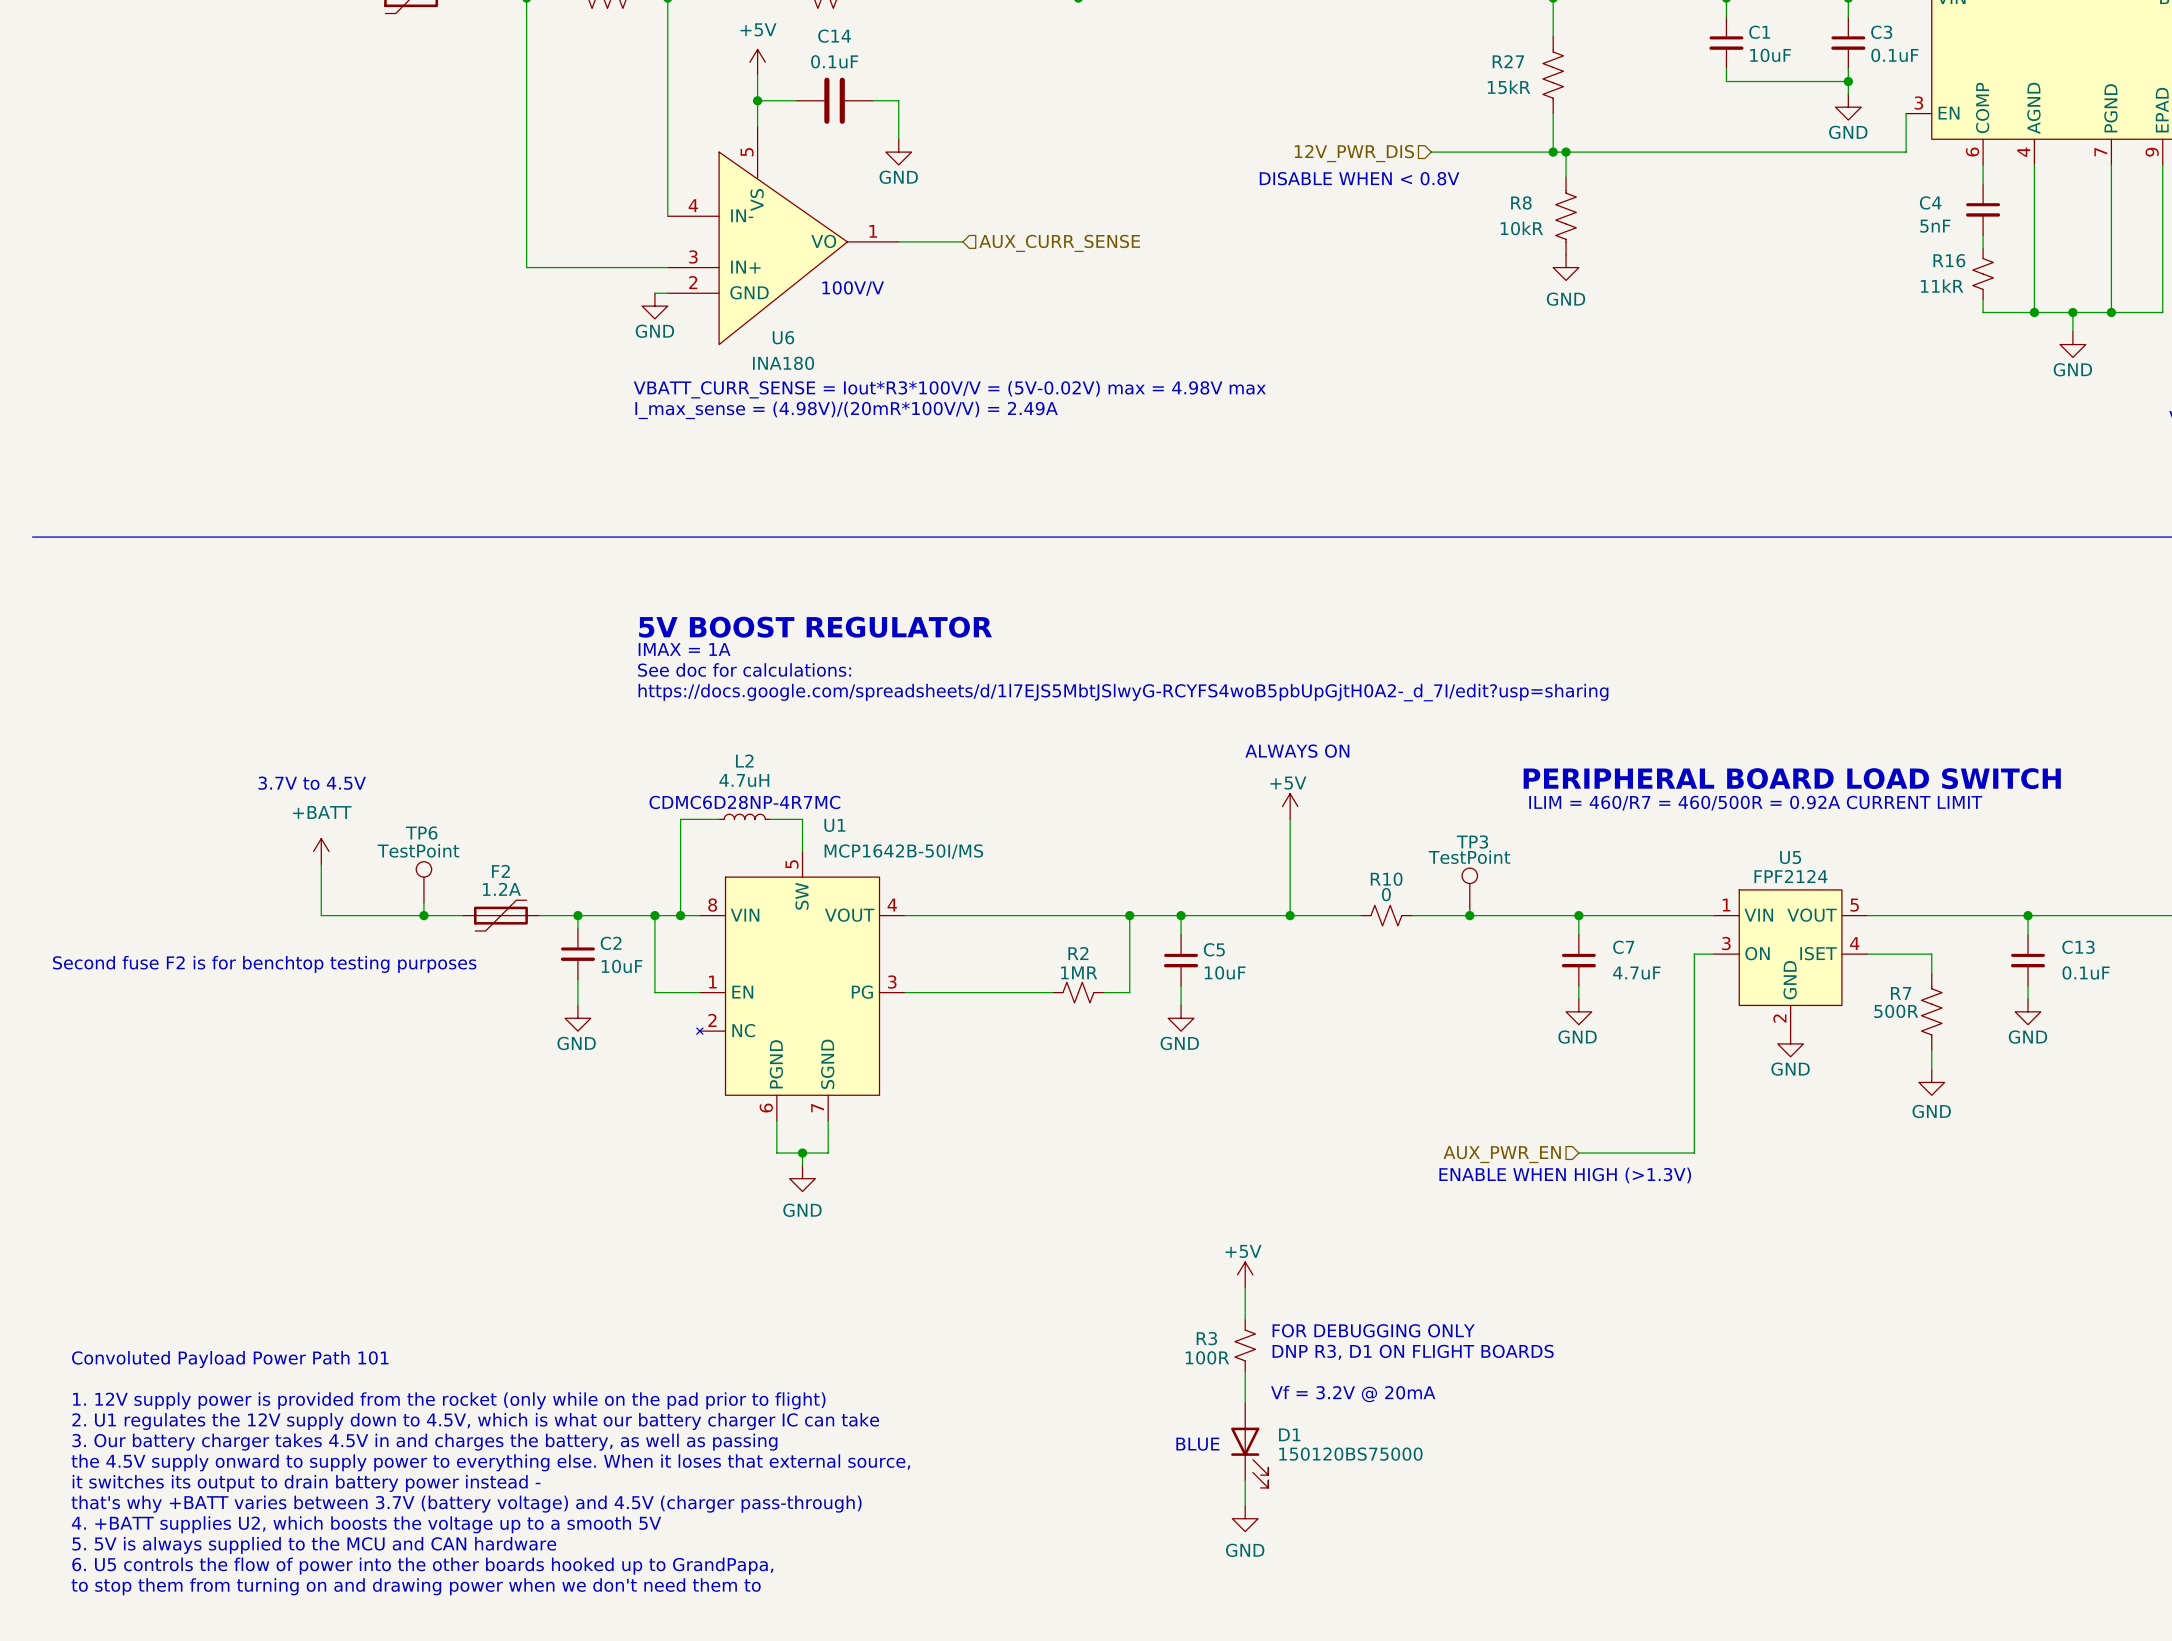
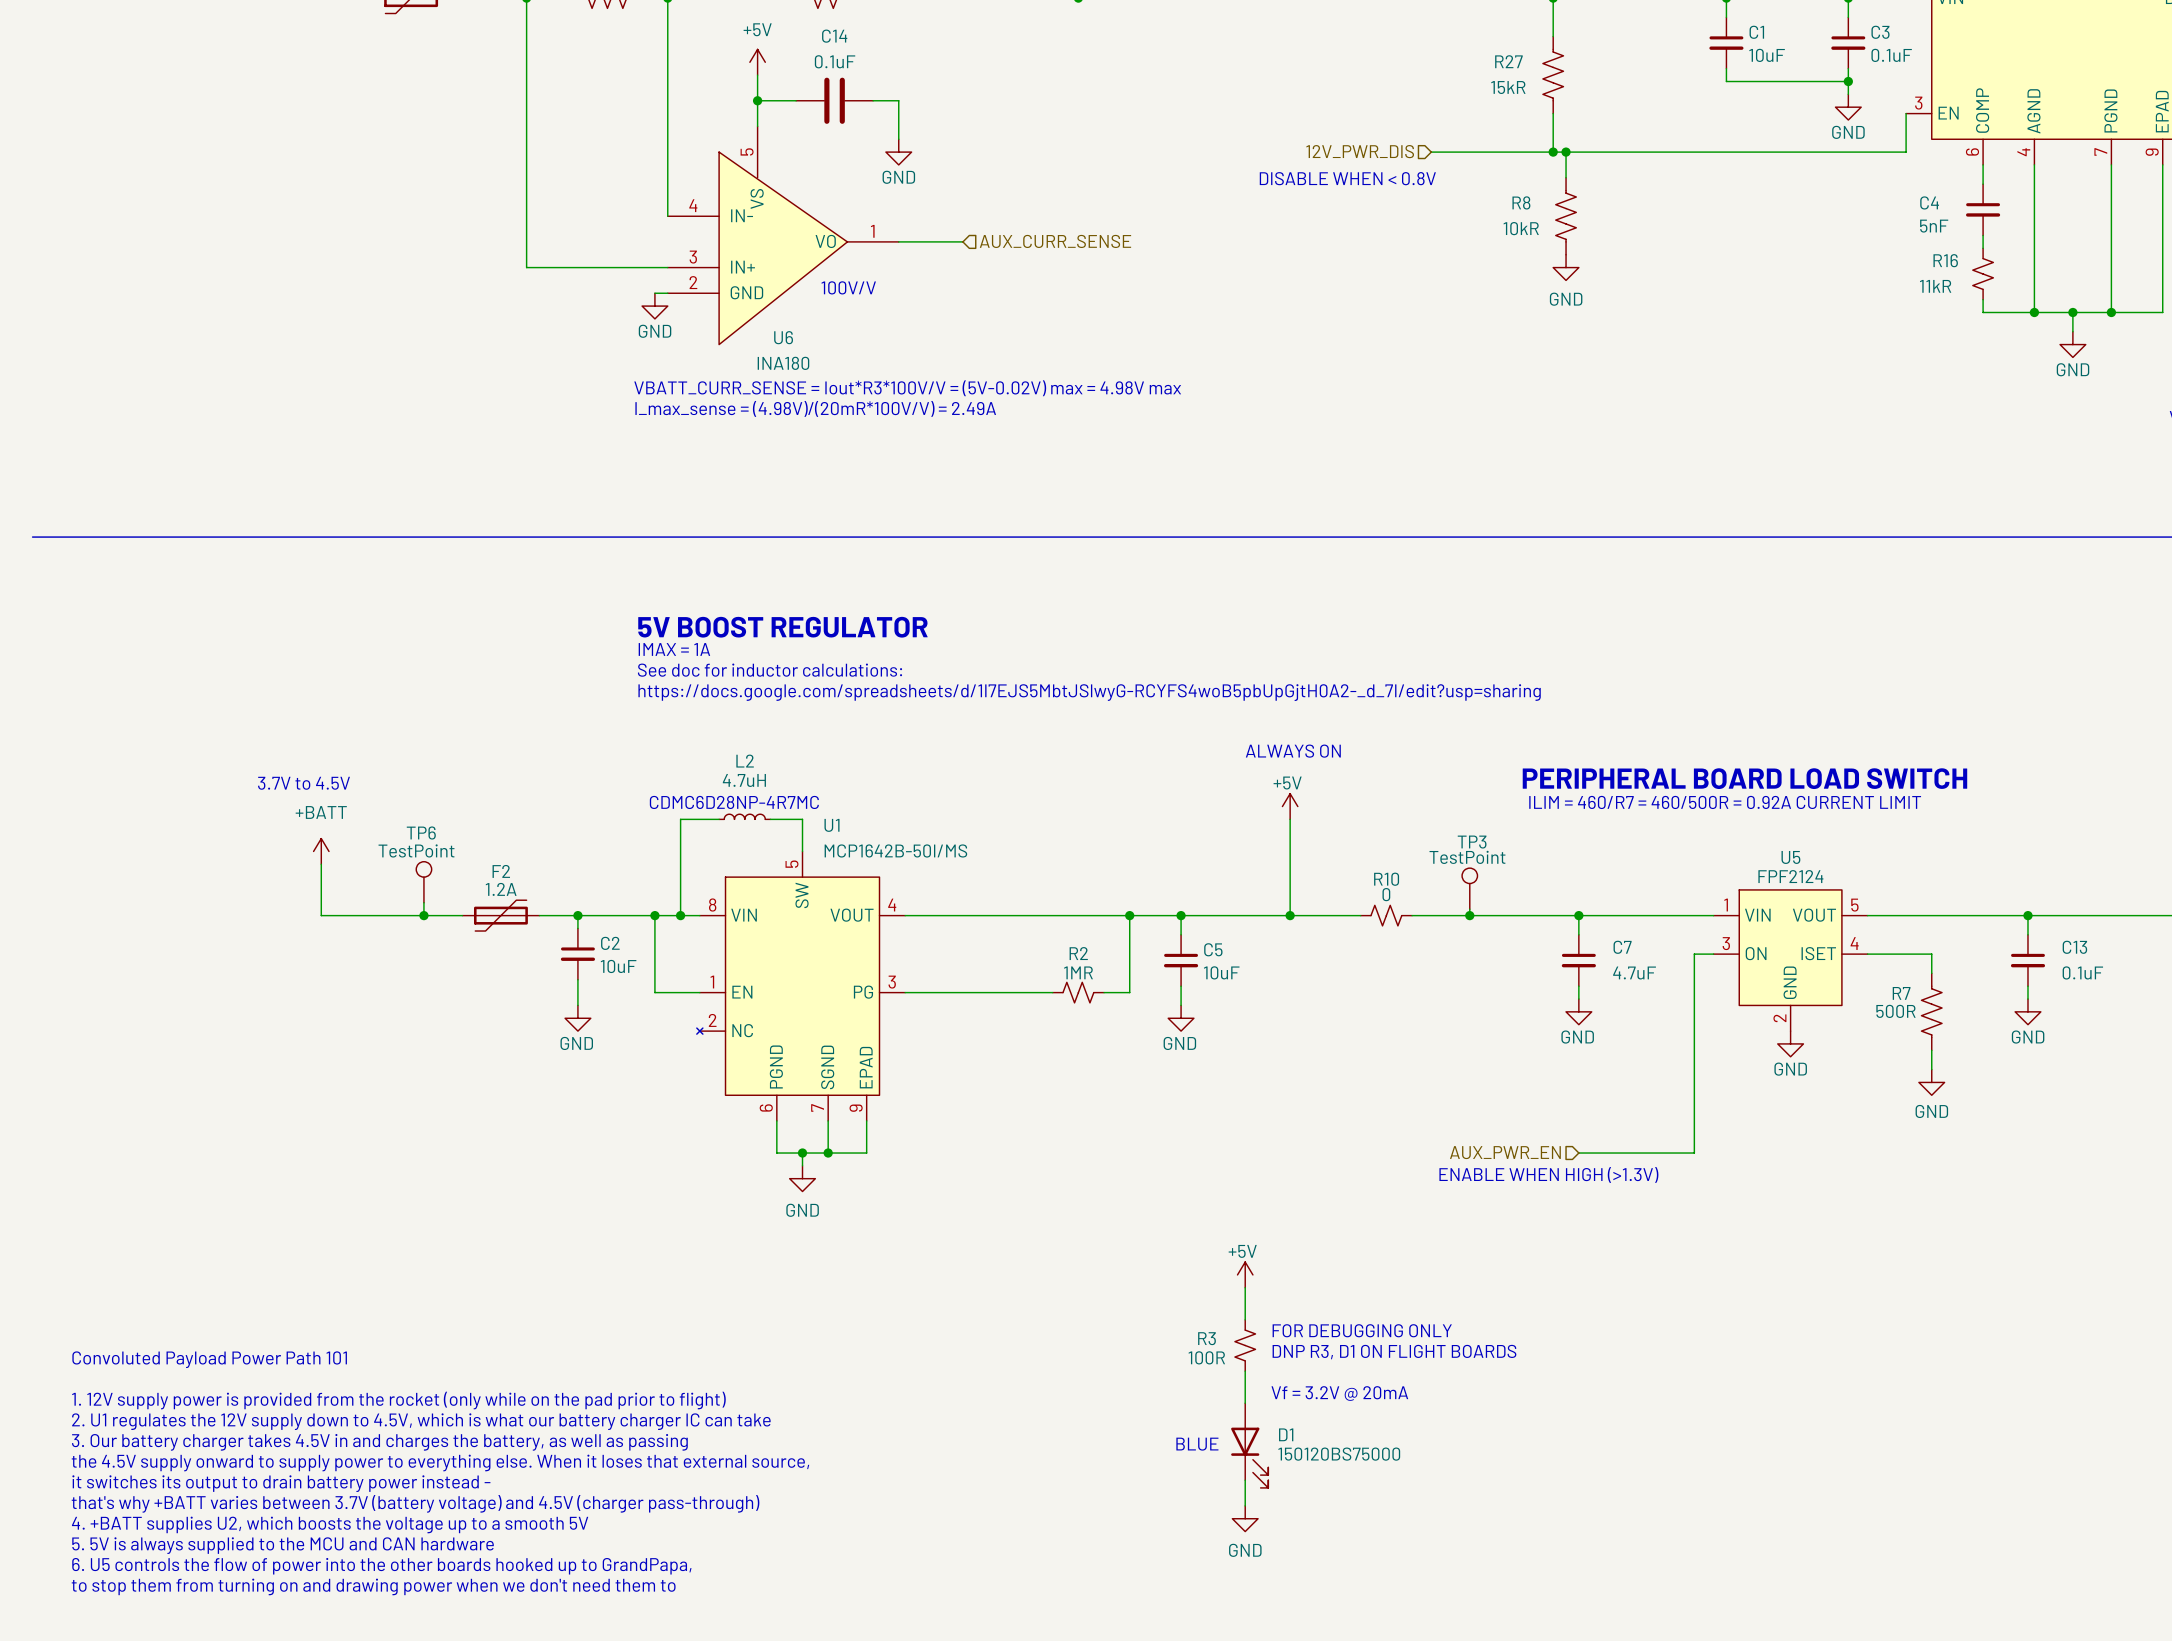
text: See doc for calculations: (744, 669) -> See doc for inductor calculations: (770, 670)
U1 symbol: [696, 851, 906, 1121] -> [696, 851, 906, 1121]
text: Second fuse F2 is for benchtop testing purposes (264, 964) -> none
wire: none -> (866, 1120) (866, 1153) (828, 1153)
junction: none -> (828, 1153)

